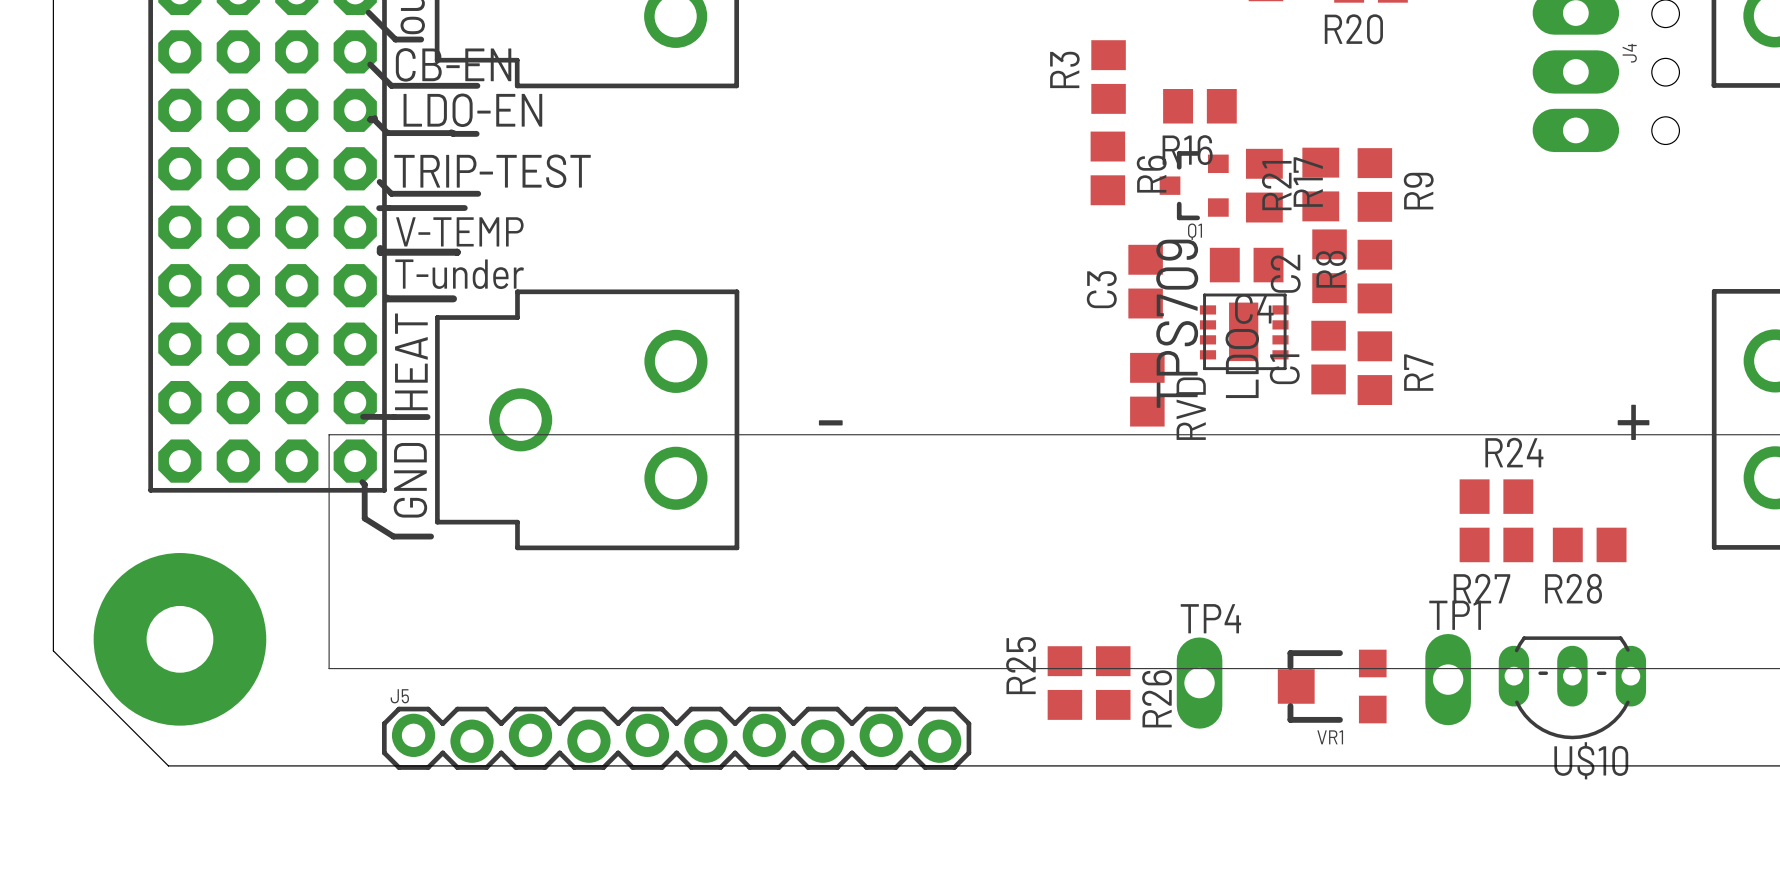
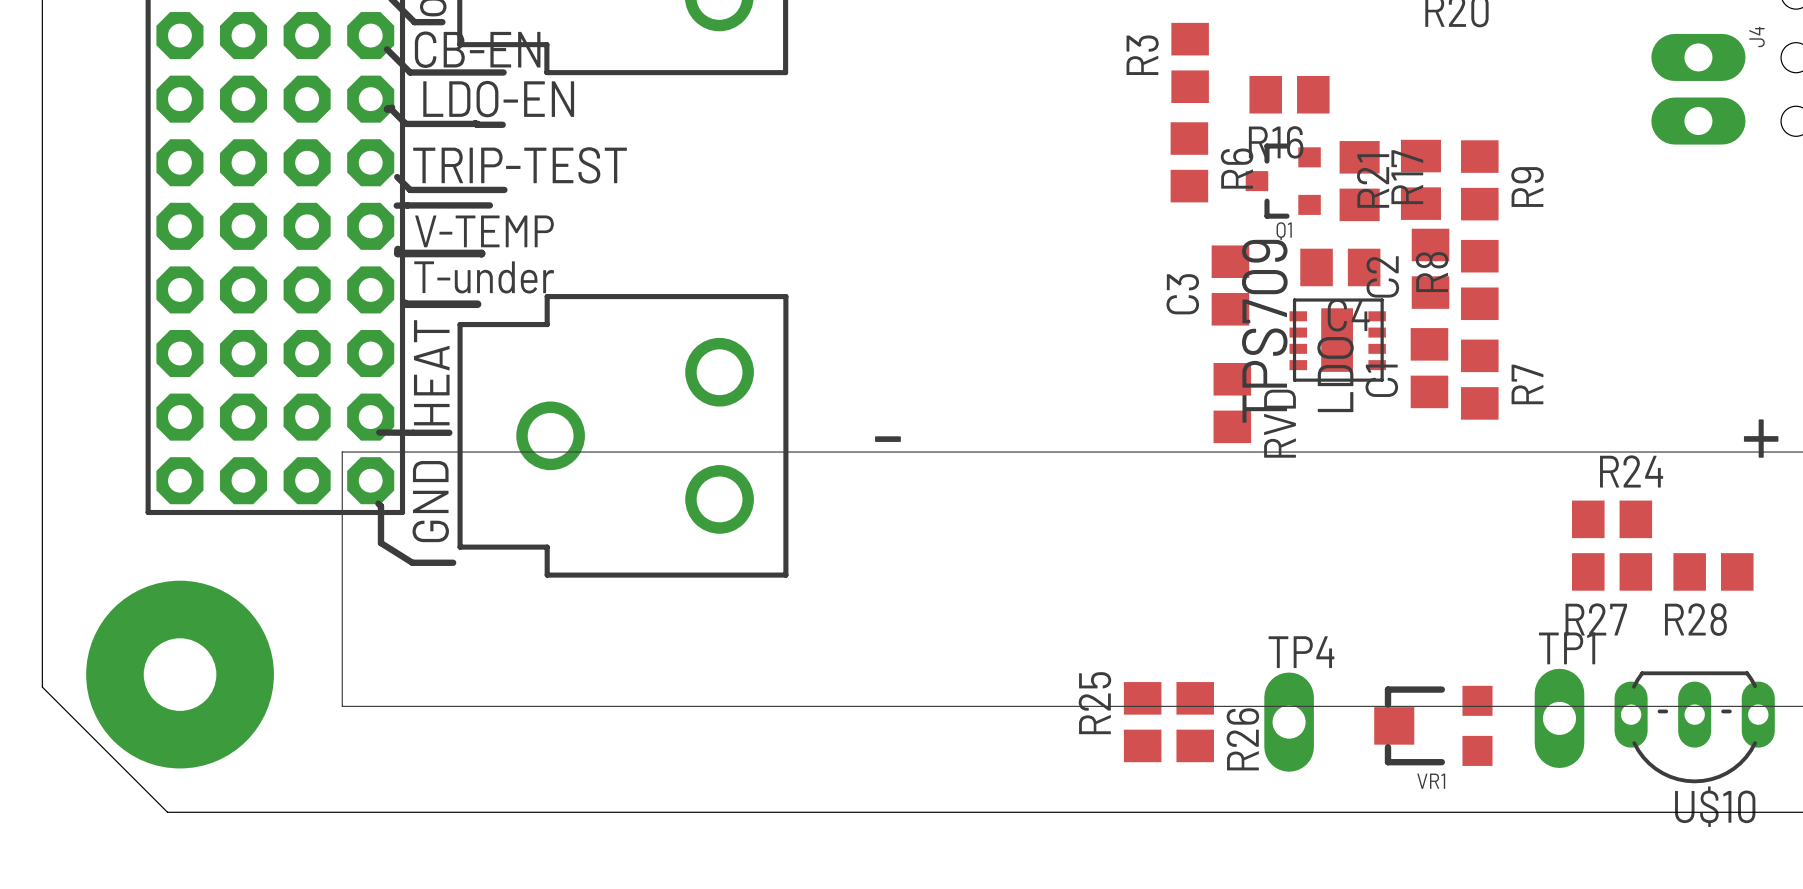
J5: (676, 738) -> none

